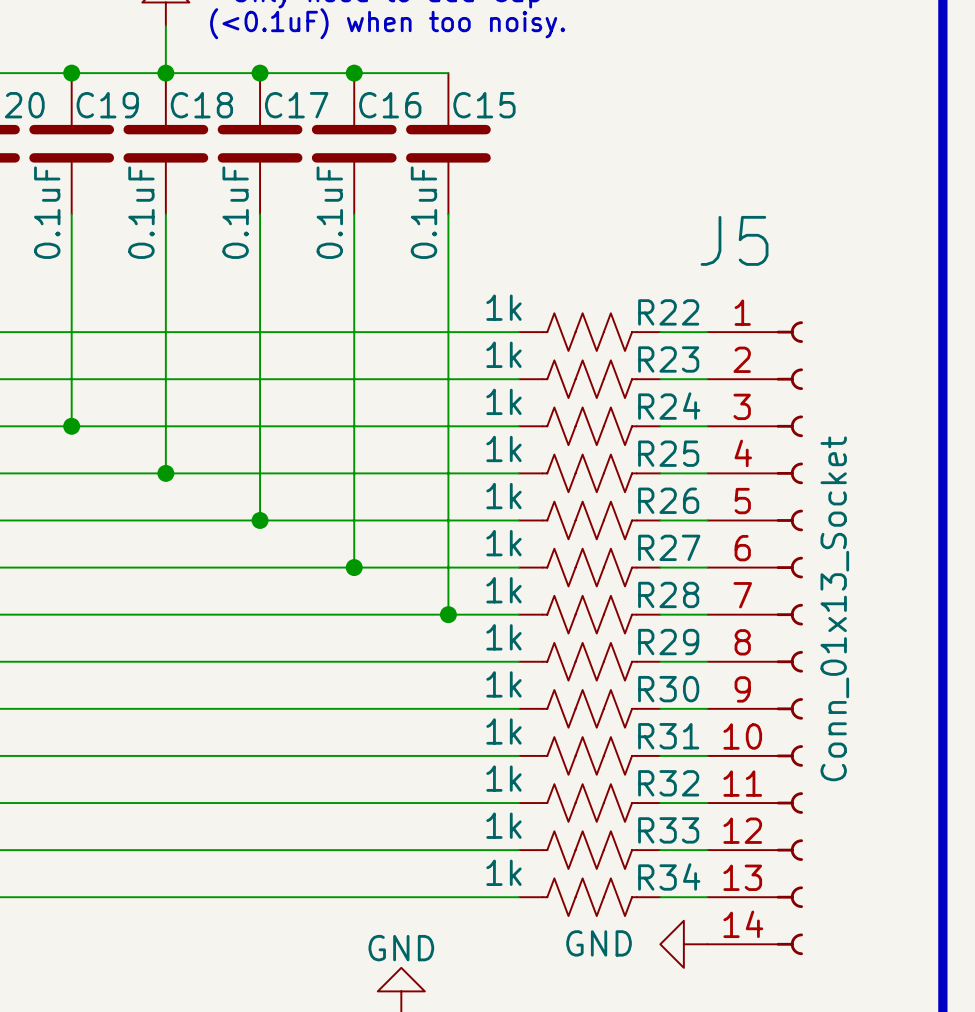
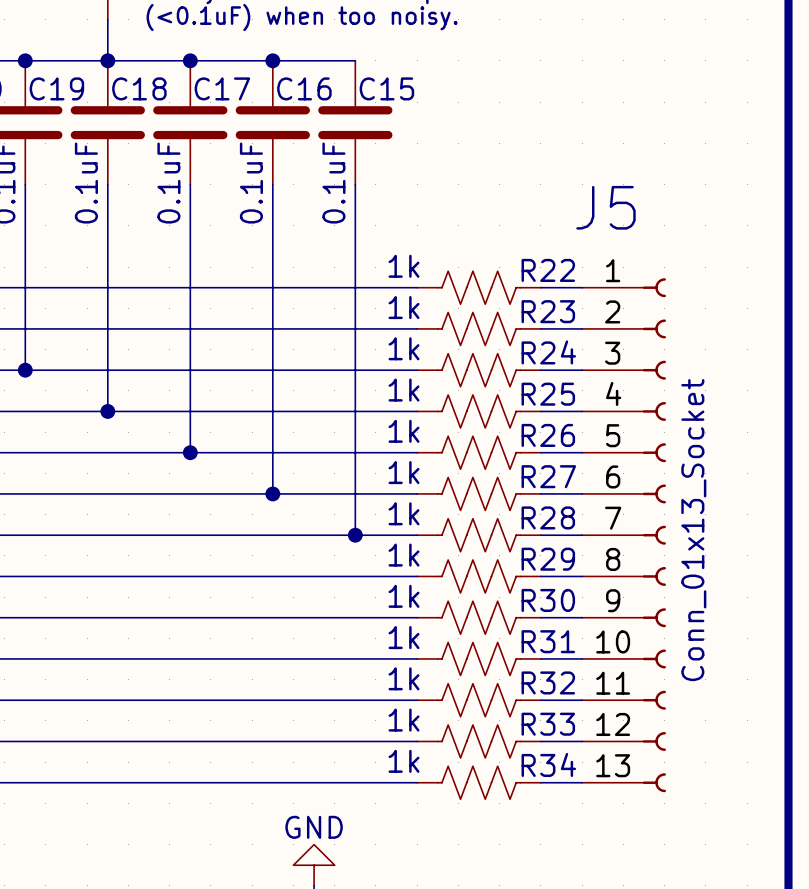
J5 symbol: [707, 321, 804, 956] -> [582, 278, 666, 793]
power symbol: GND (683, 944) -> none

